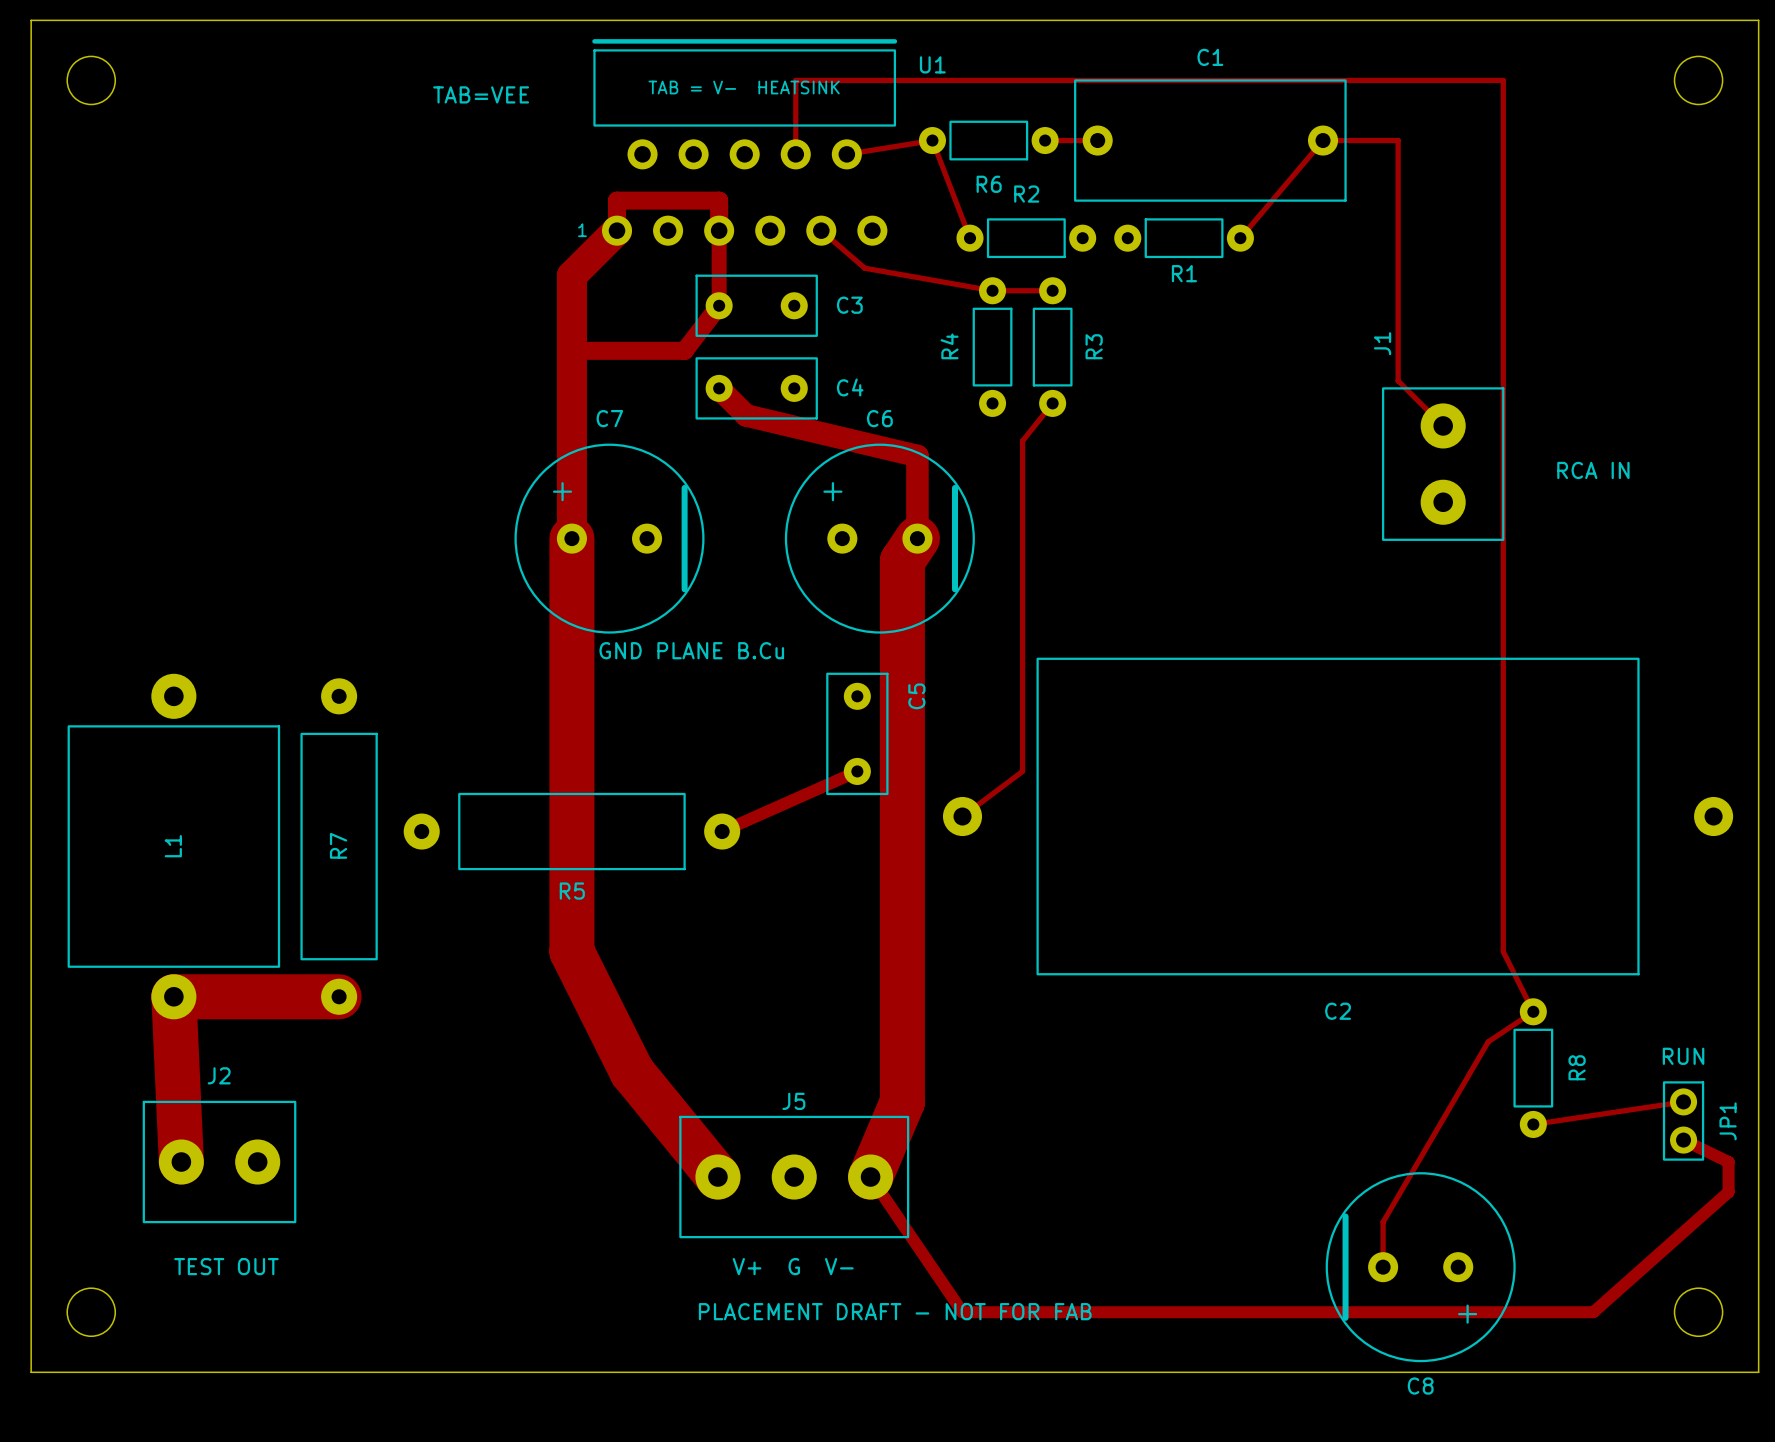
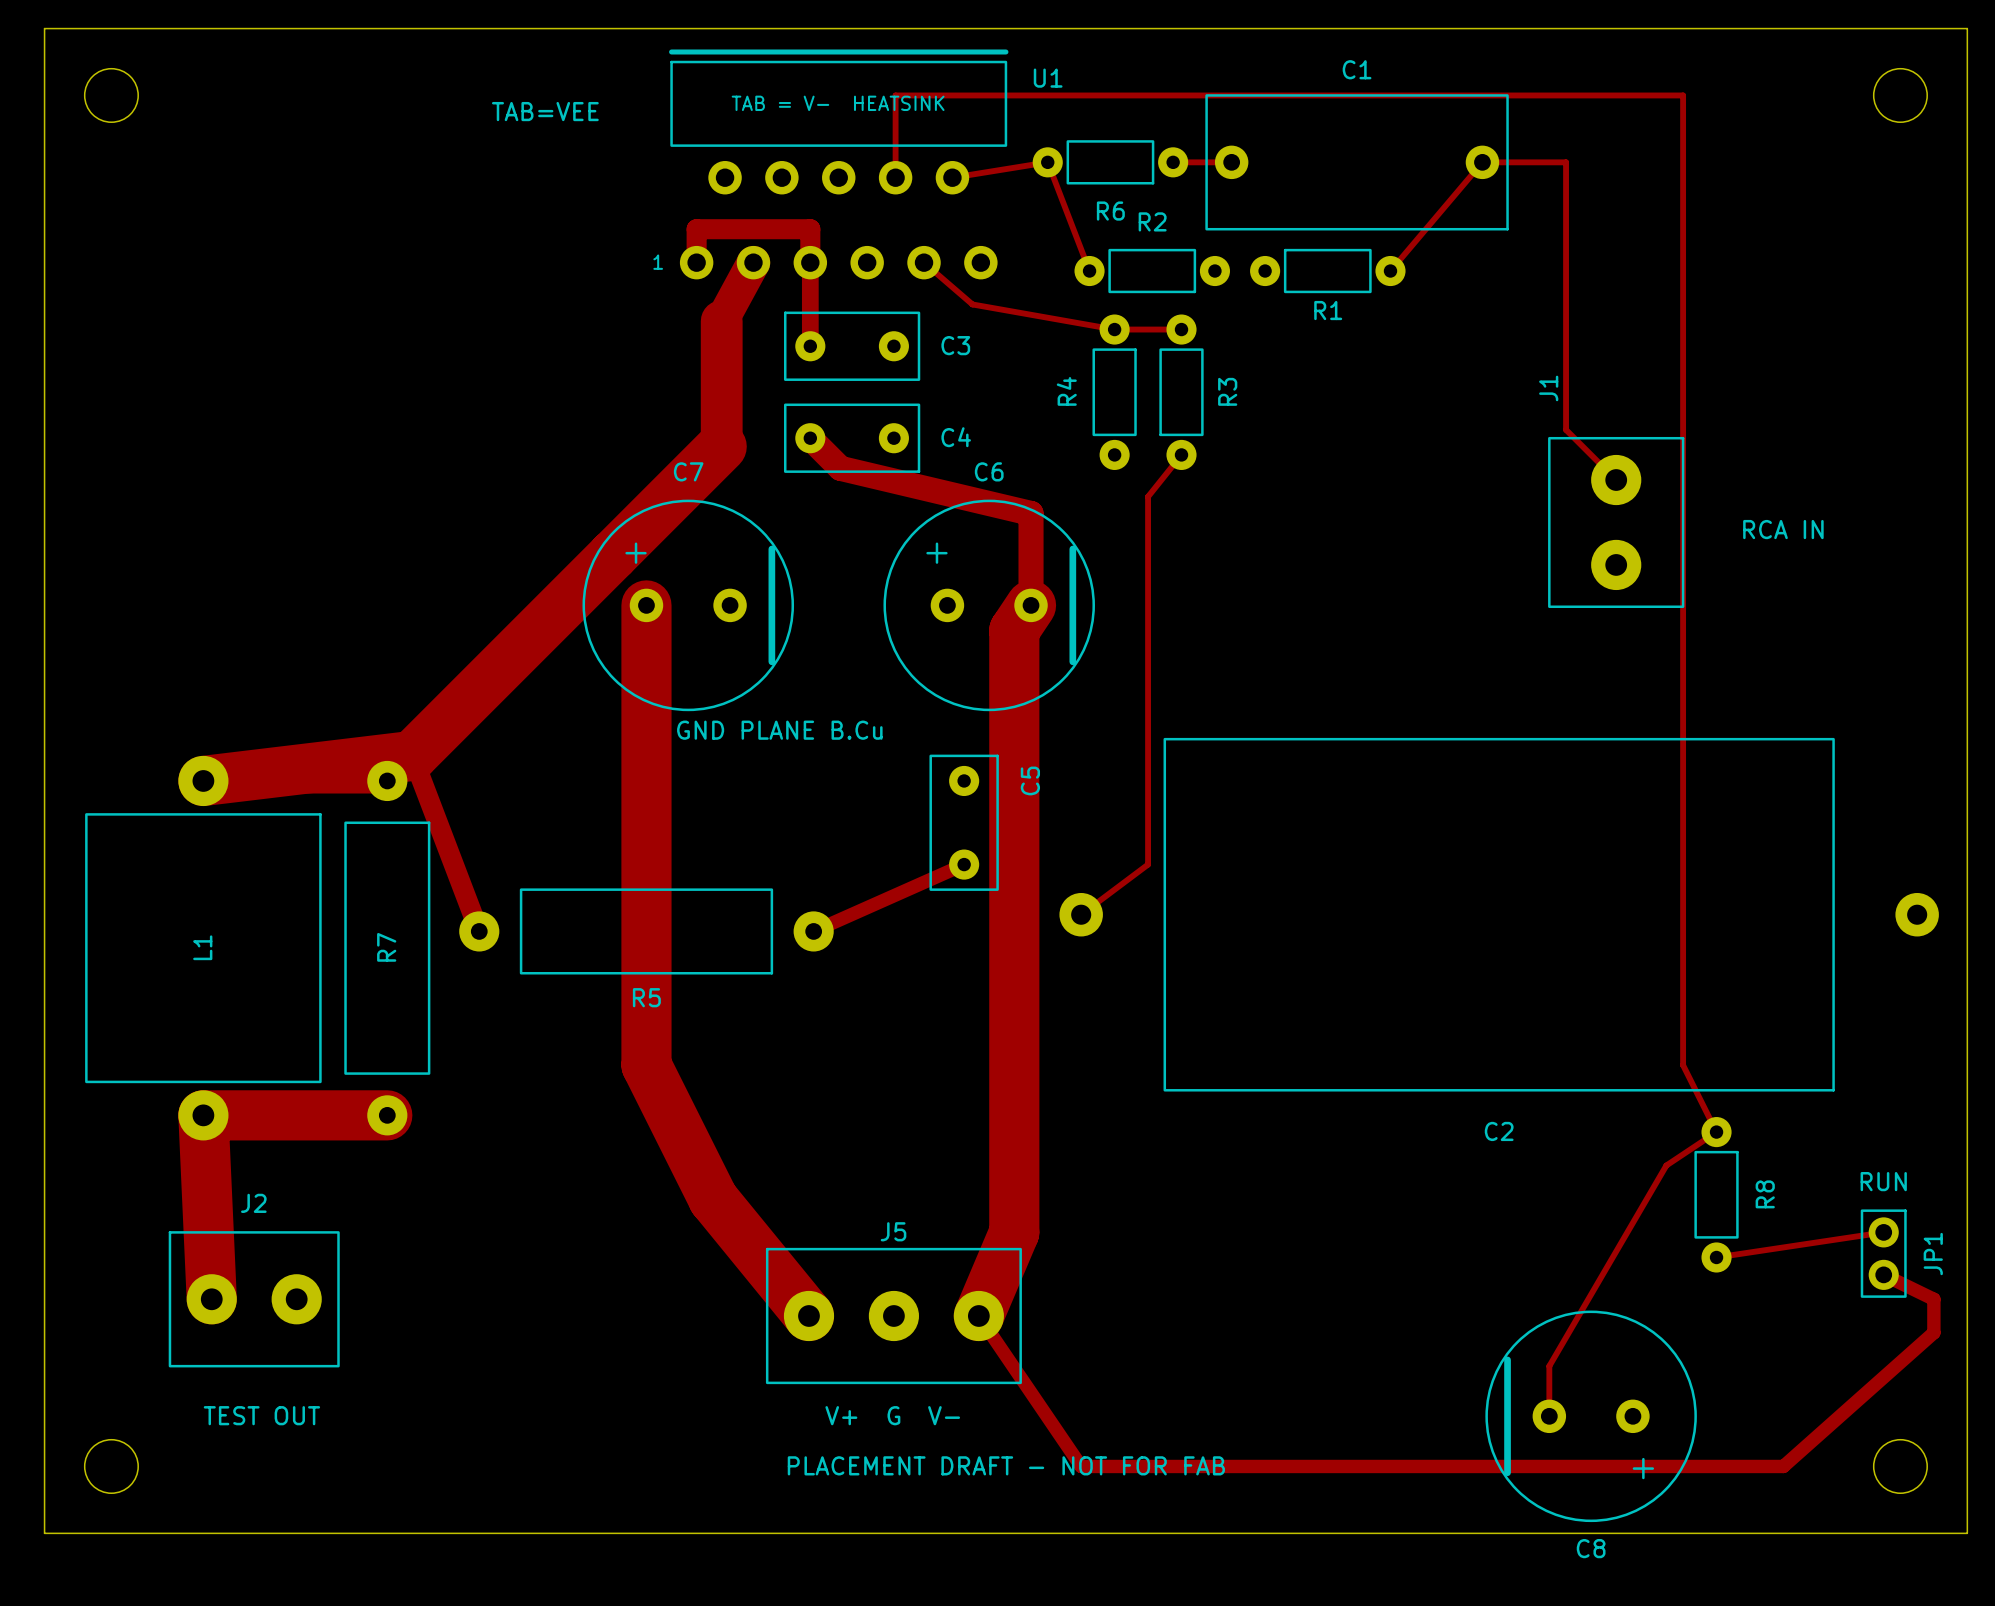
track: (617, 230) (571, 275) (571, 538) -> none
track: none -> (753, 262) (721, 321) (721, 446) (412, 755)
track: (719, 305) (684, 350) (571, 350) -> none
track: none -> (412, 755) (203, 780) (387, 780)
track: none -> (412, 755) (479, 931)

